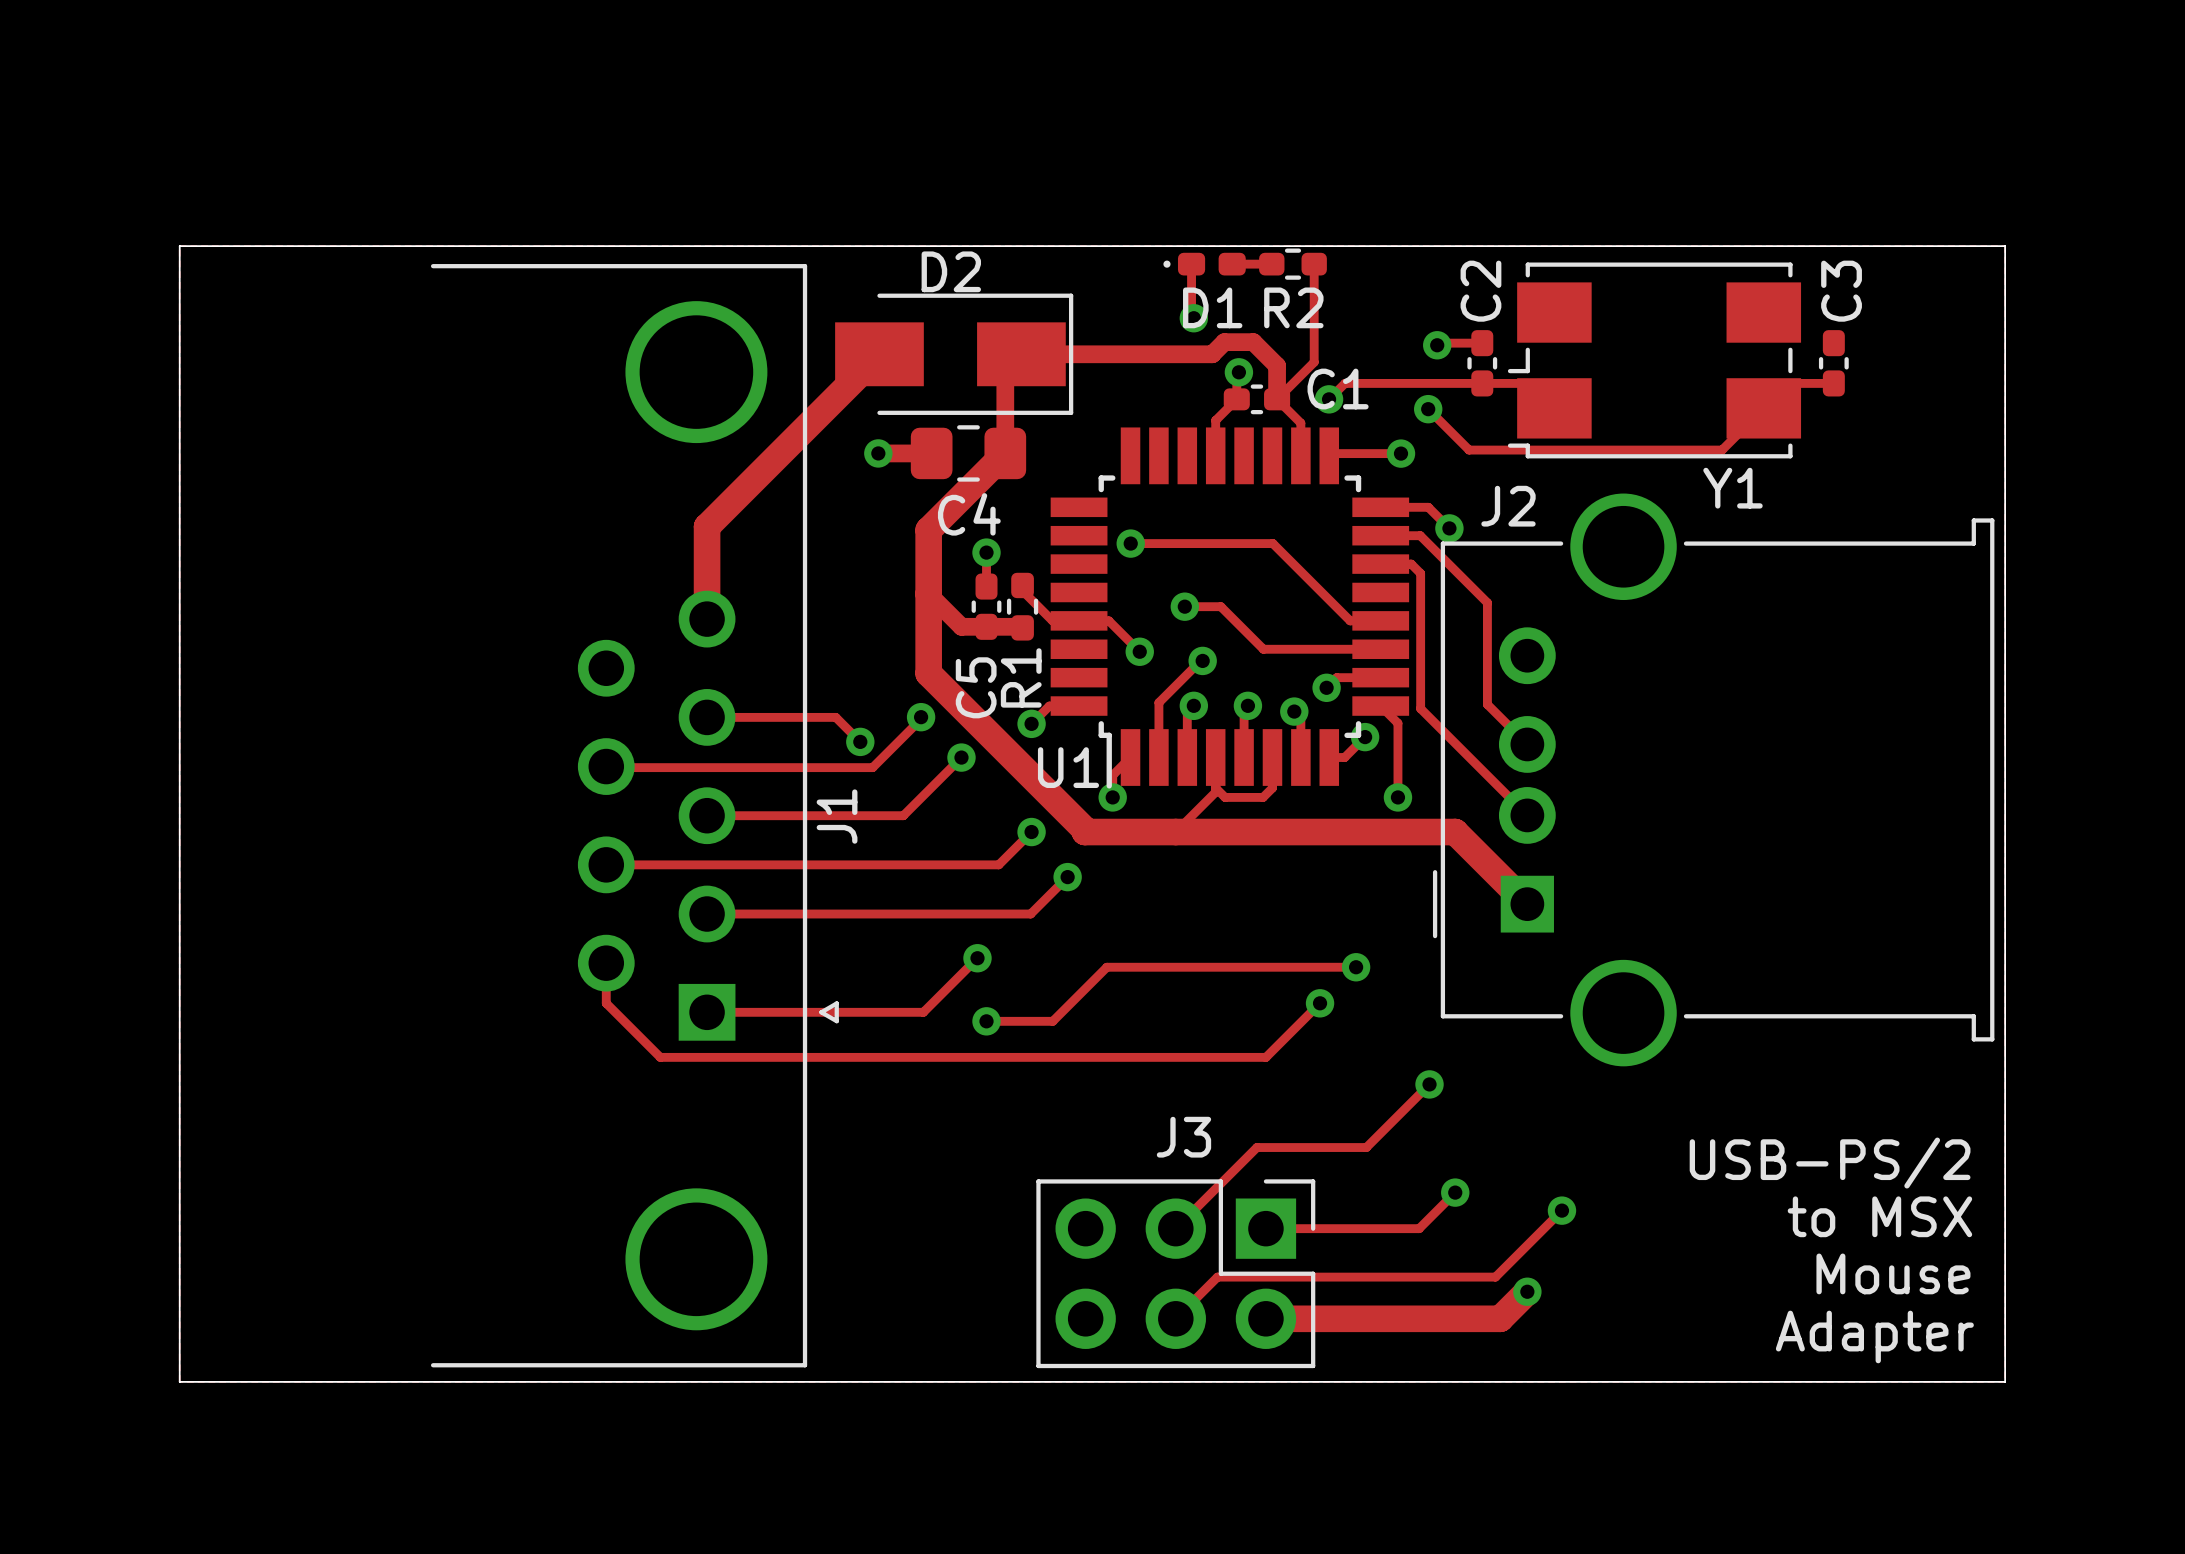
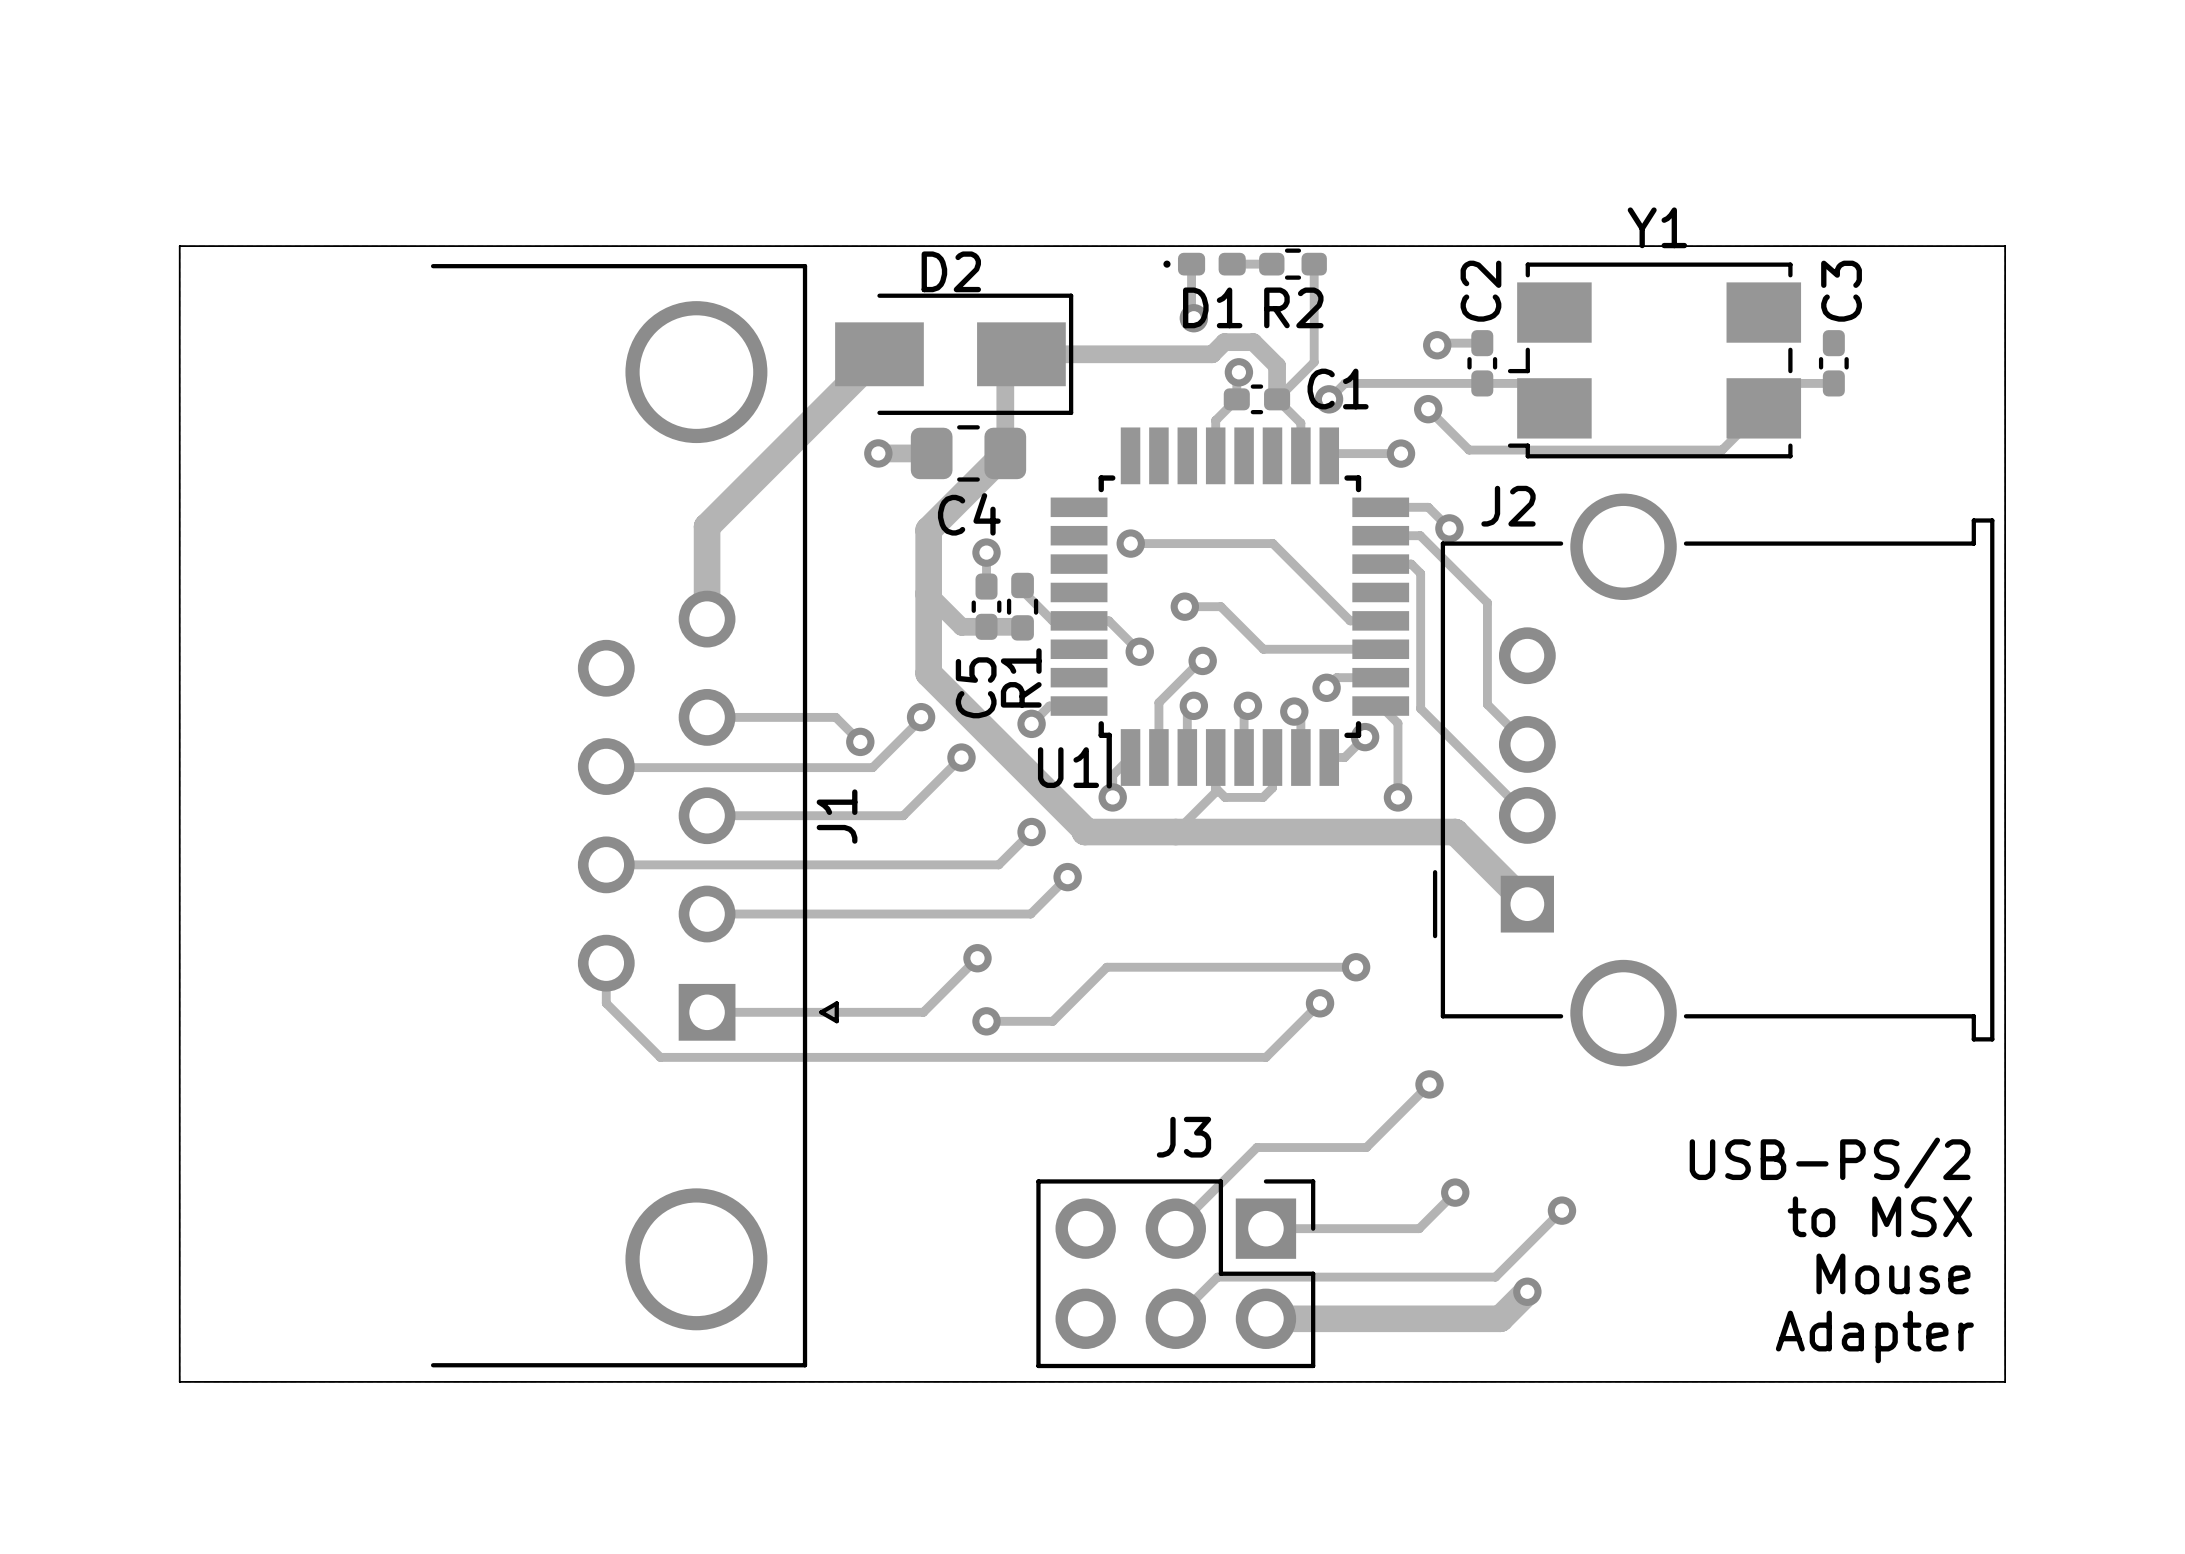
Y1 name position: Y1 (1733, 488) -> Y1 (1657, 227)

